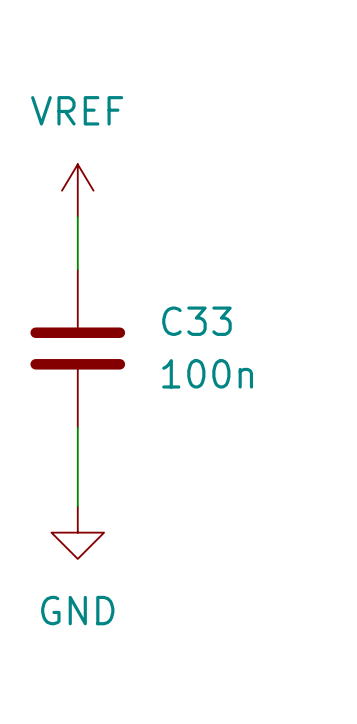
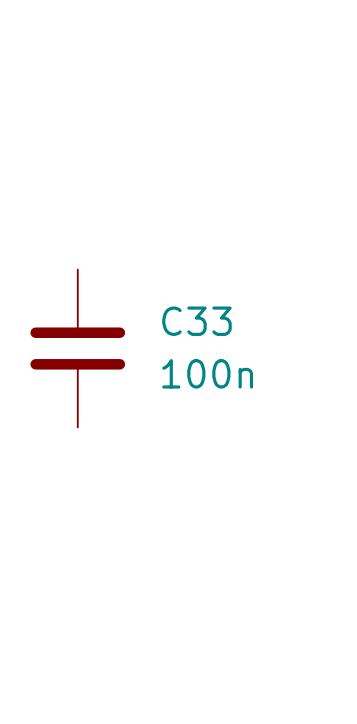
power symbol: VREF (77, 190) -> none
wire: (77, 216) (77, 269) -> none
wire: (77, 427) (77, 506) -> none
power symbol: GND (77, 532) -> none

